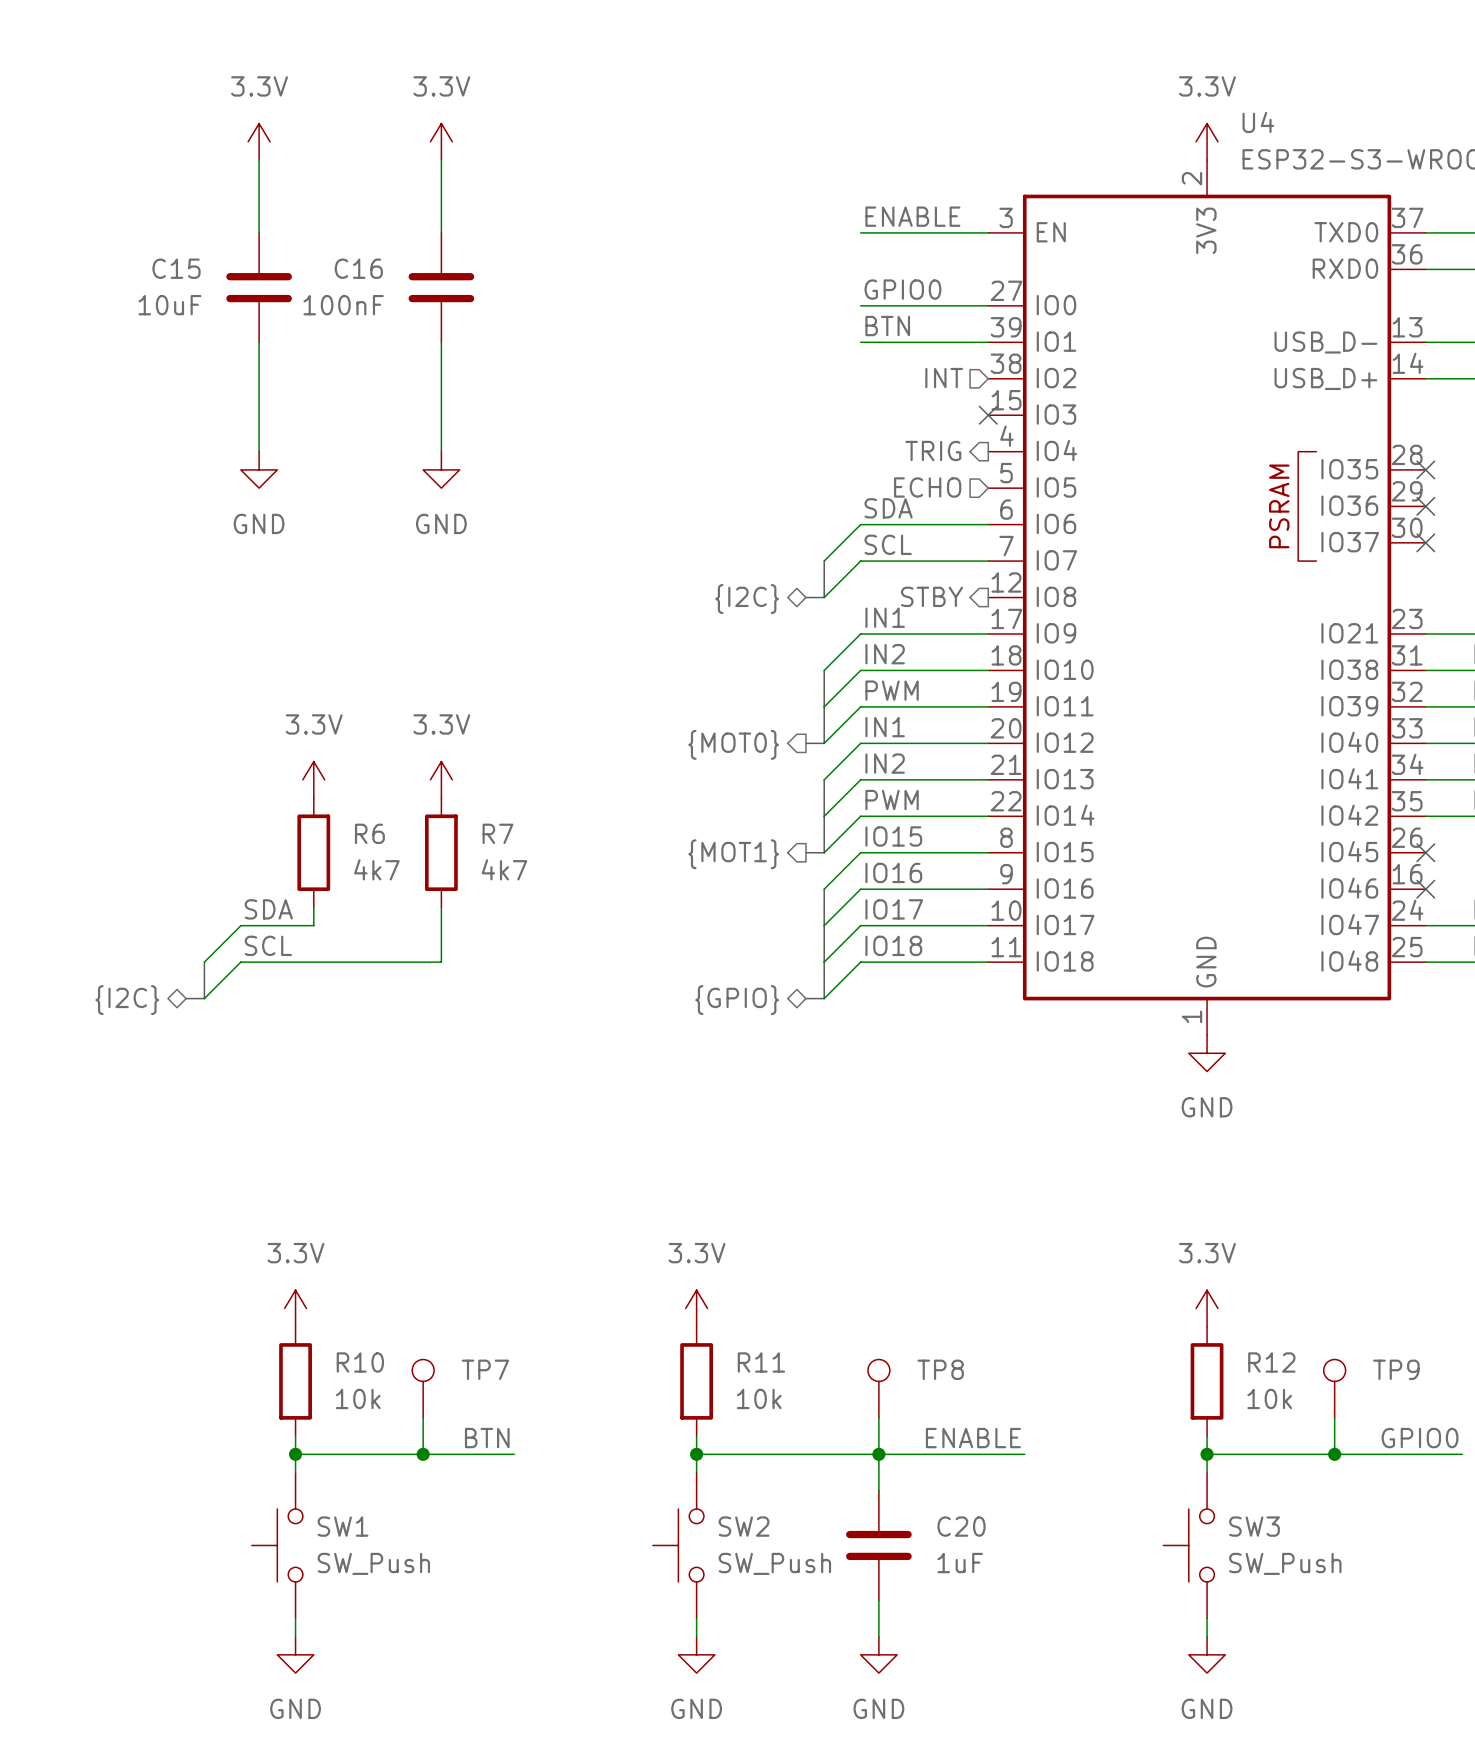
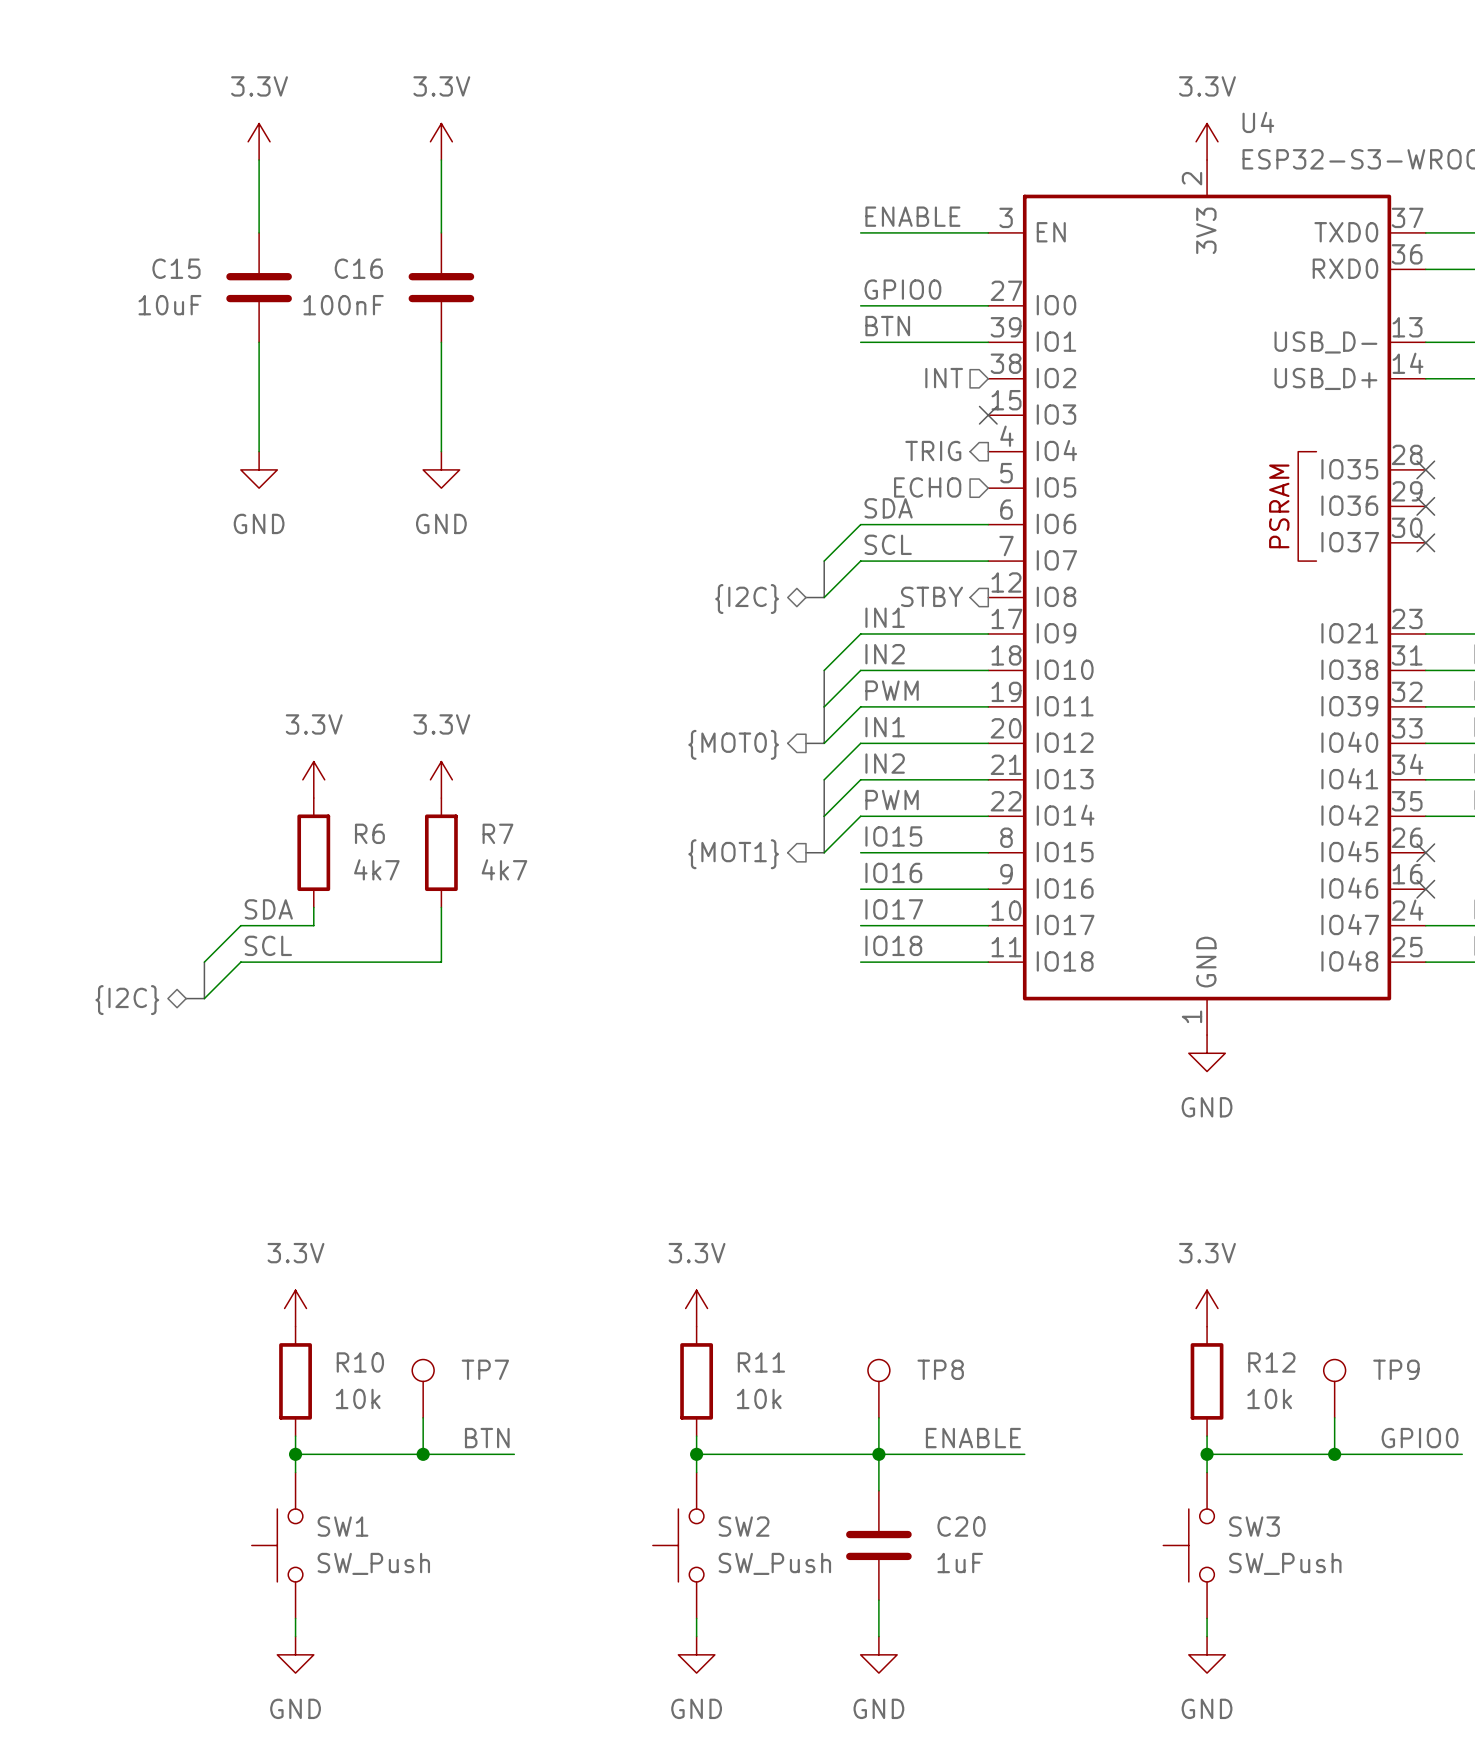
wire: (860, 852) (824, 889) -> none
bus: (824, 889) (824, 998) (805, 998) -> none
wire: (860, 889) (824, 925) -> none
wire: (860, 925) (824, 962) -> none
wire: (860, 962) (824, 998) -> none
hierarchical label: {GPIO} (737, 1000) -> none

